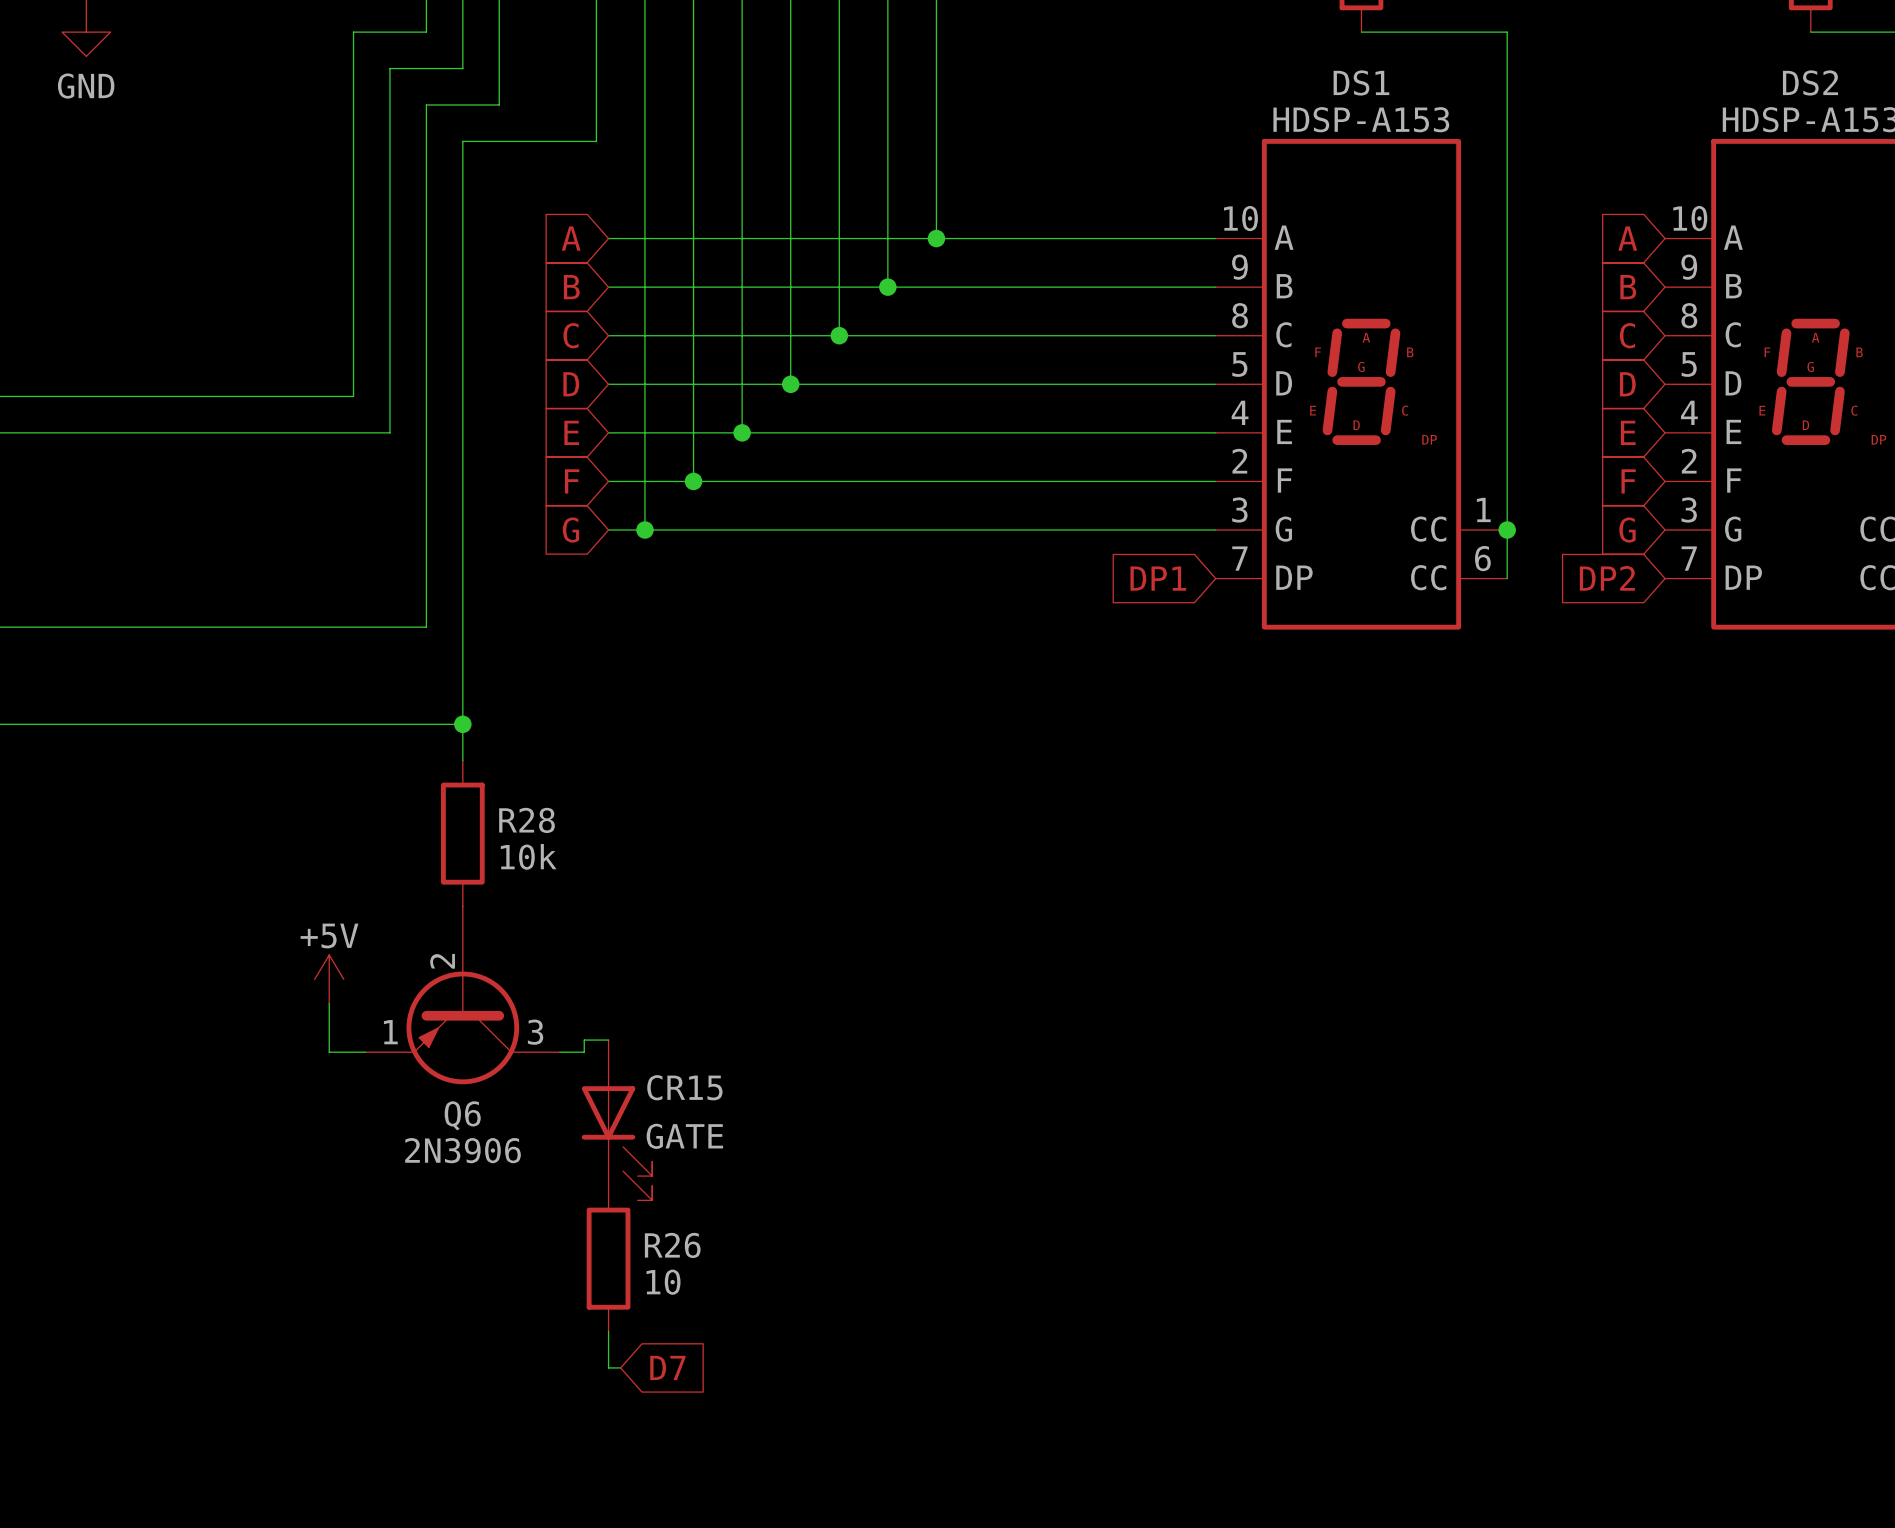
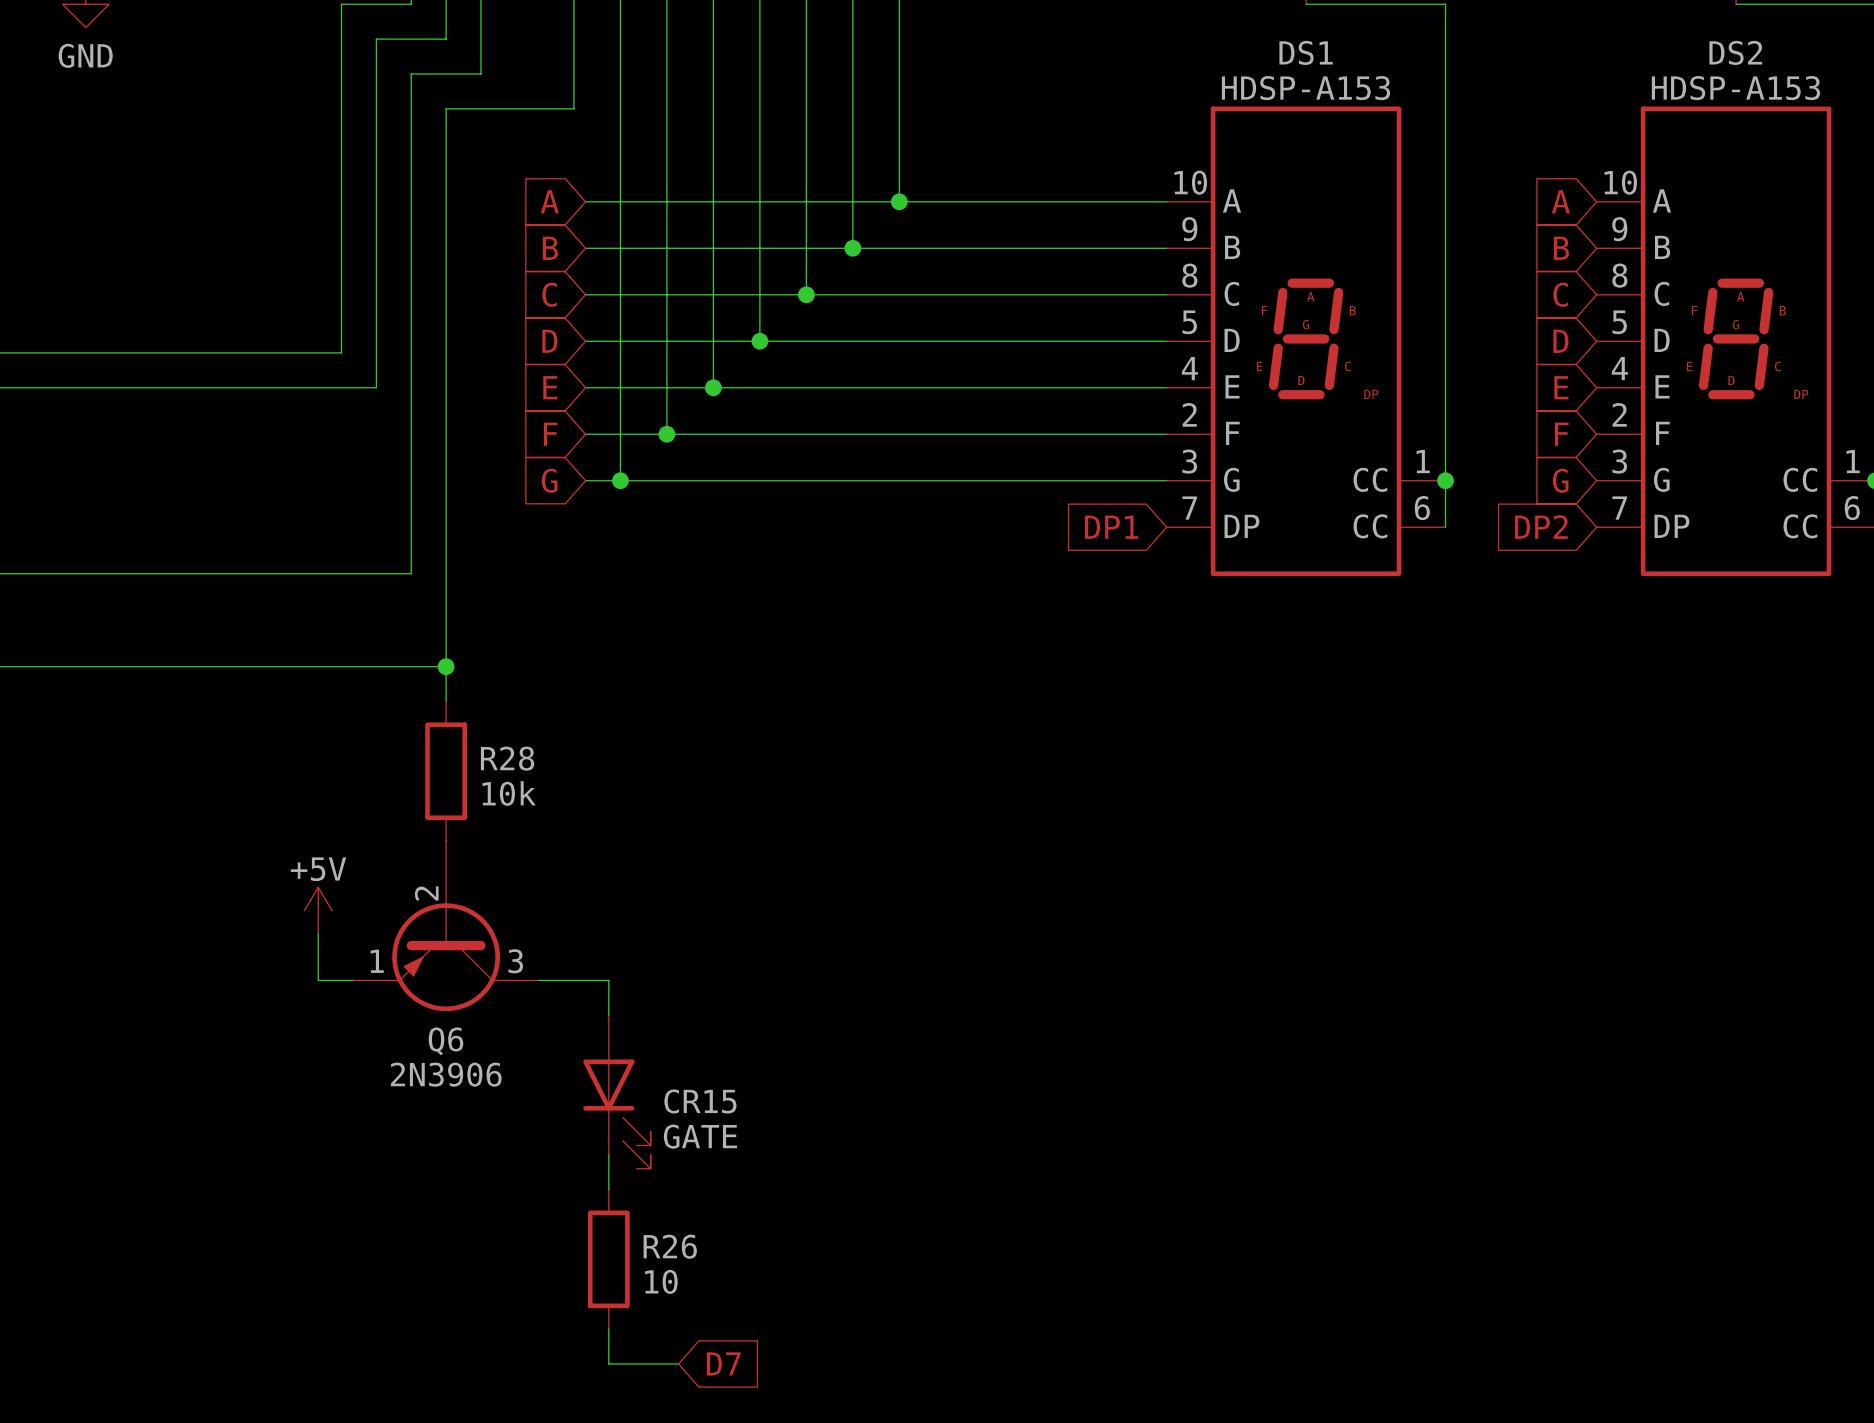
wire: (608, 1040) (584, 1040) (584, 1052) -> (608, 1015) (608, 980) (562, 980)
CR15 name position: CR15 (684, 1087) -> CR15 (700, 1101)
CR15 position: (617, 1120) -> (616, 1092)
CR15 value position: GATE (684, 1136) -> GATE (700, 1136)
wire: none -> (608, 1154) (608, 1189)
R26 position: (608, 1258) -> (608, 1259)
wire: (608, 1331) (608, 1367) (620, 1367) -> none
global label position: D7 (667, 1367) -> D7 (723, 1363)
wire: none -> (608, 1329) (608, 1363) (678, 1363)

